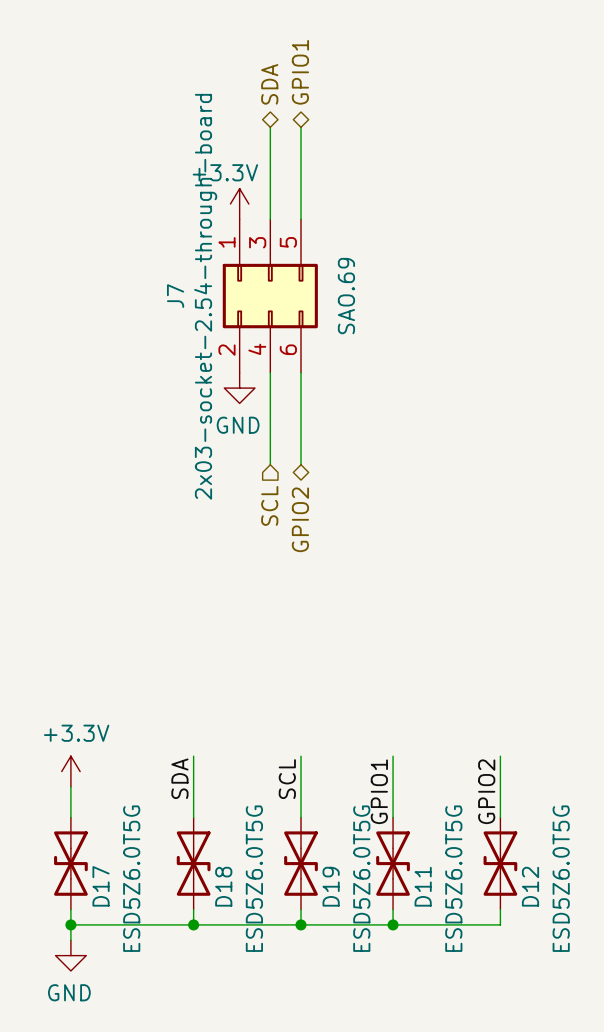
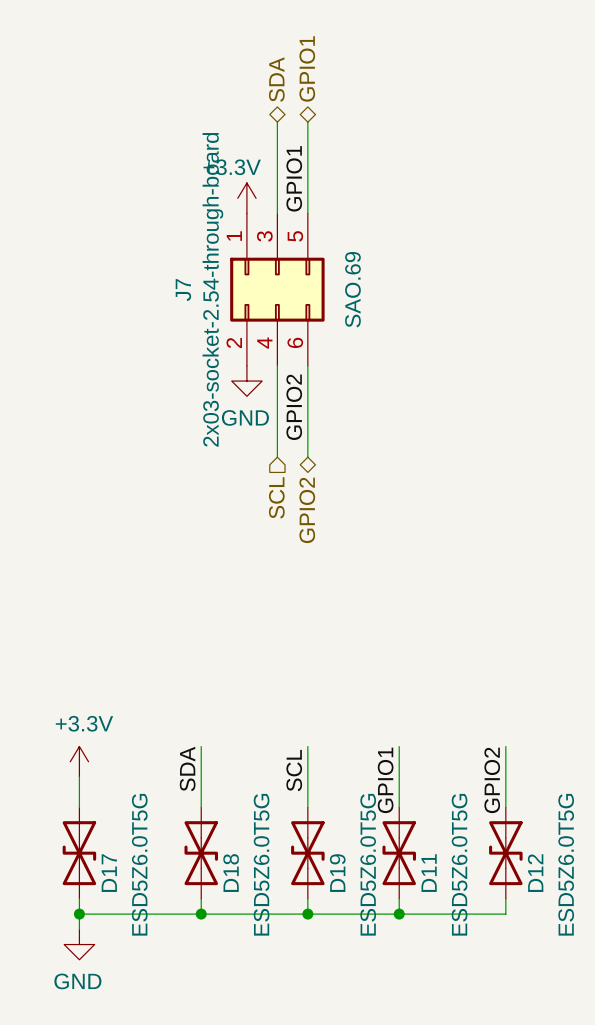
label: none -> GPIO1 (294, 178)
label: none -> GPIO2 (294, 407)

